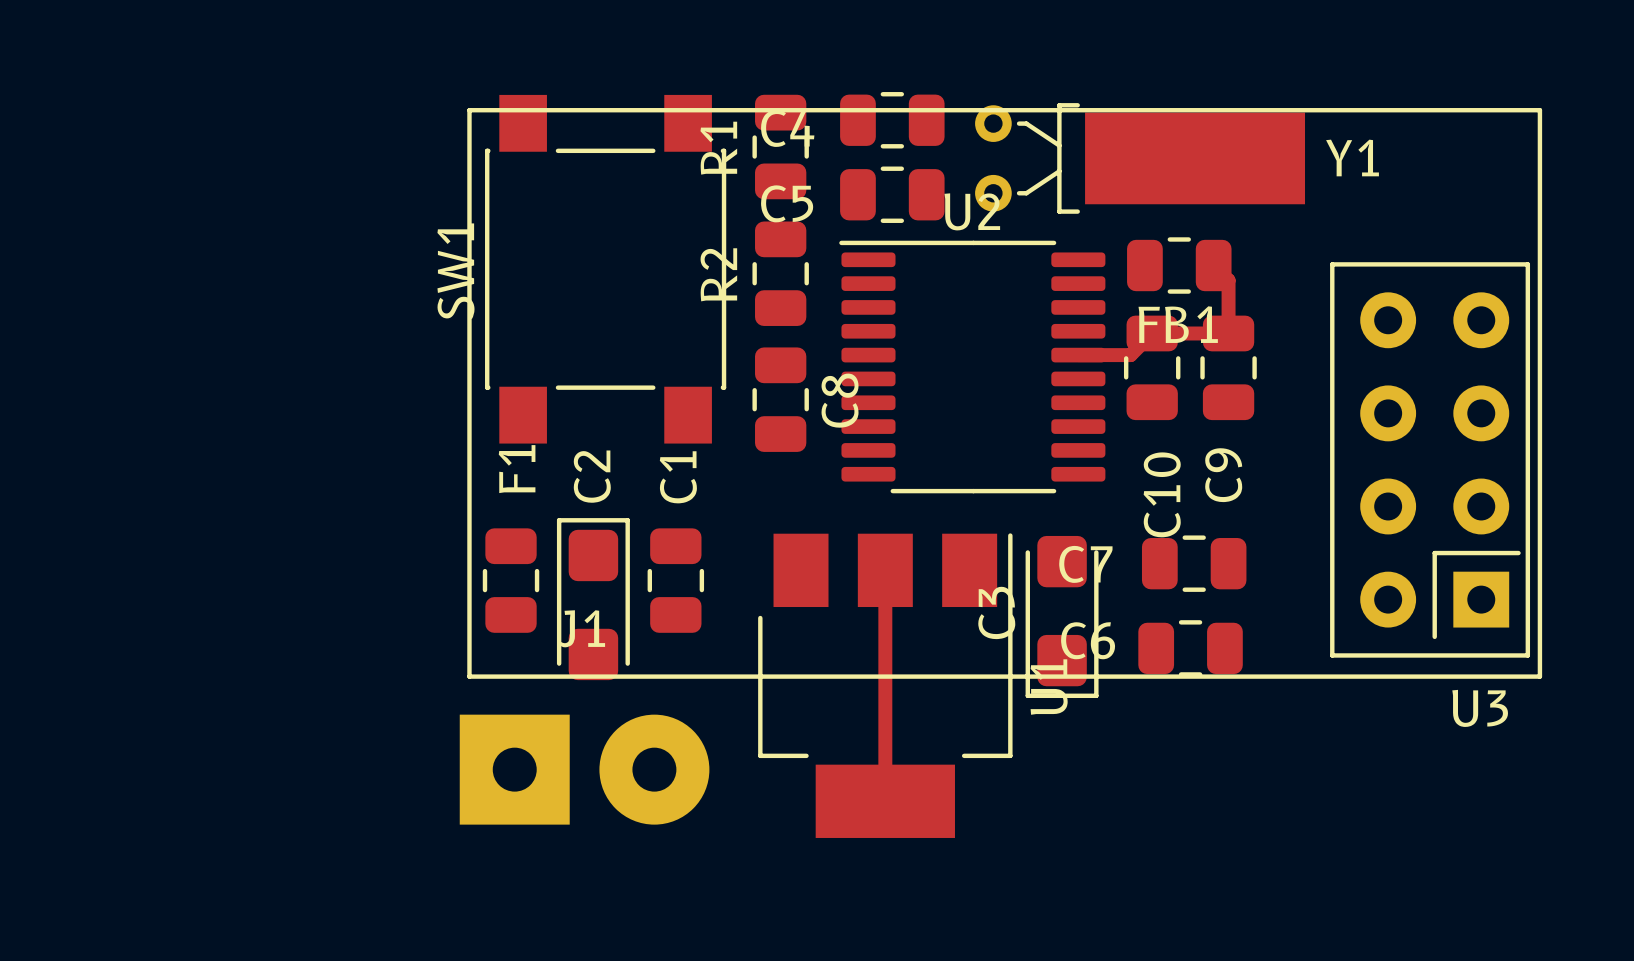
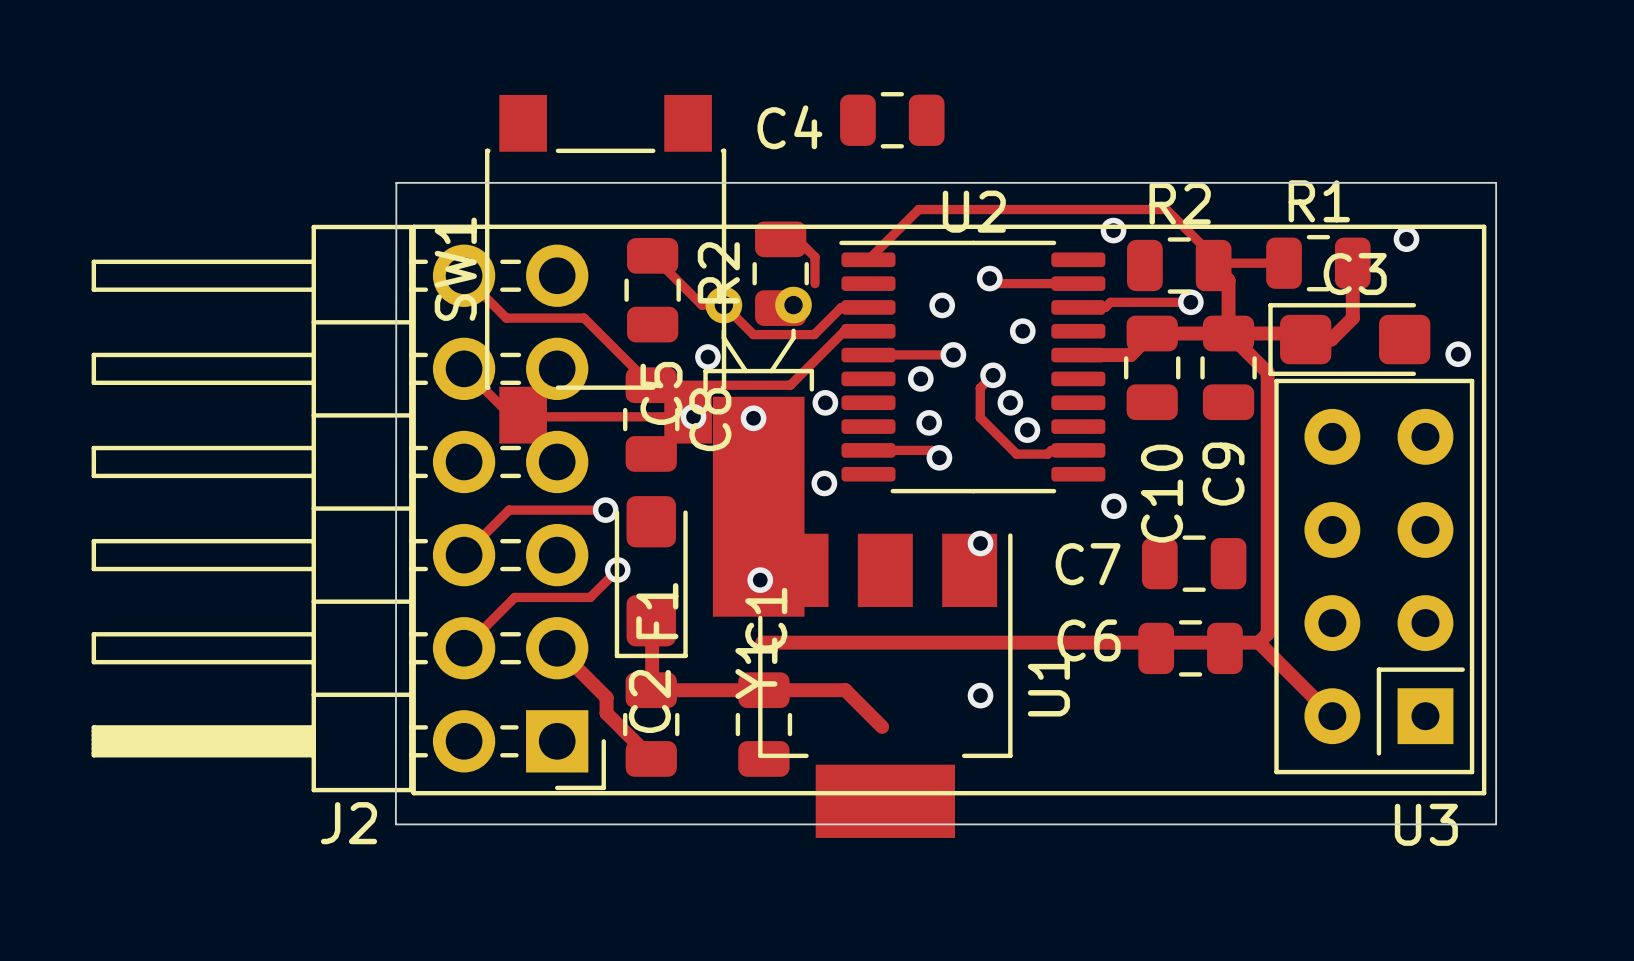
R1 rotation: 0° (780, 147) -> 90° clockwise (1318, 263)
R1 position: (780, 147) -> (1318, 263)
Y1 rotation: 0° (1140, 158) -> 90° clockwise (758, 451)
Y1 position: (1140, 158) -> (758, 451)
C5 rotation: 0° (892, 194) -> 90° clockwise (652, 290)
C5 position: (892, 194) -> (652, 290)
C5 name position: C5 (787, 203) -> C5 (661, 393)
via: none -> (1113, 230)
track: none -> (794, 236) (815, 257) (815, 283)
via: none -> (1406, 239)
track: none -> (652, 255) (701, 305) (723, 305) (753, 334) (814, 334) (841, 307) (868, 307)
track: none -> (868, 259) (918, 209) (1166, 209) (1220, 263) (1284, 263)
track: none -> (1352, 263) (1352, 318) (1331, 339) (1305, 339) (1299, 333) (1228, 333) (1267, 372) (1267, 633) (1258, 642)
track: none -> (464, 275) (506, 318) (584, 318) (651, 385) (790, 385) (844, 331) (868, 331)
track: none -> (989, 278) (994, 283) (1078, 283)
via: none -> (989, 278)
track: none -> (1190, 302) (1110, 302) (1105, 307) (1078, 307)
via: none -> (1190, 302)
via: none -> (942, 305)
FB1 name: FB1 (1178, 324) -> R2 (1180, 203)
via: none -> (1022, 331)
track: none -> (868, 354) (953, 354)
via: none -> (953, 354)
via: none -> (1458, 354)
via: none -> (707, 356)
track: none -> (464, 368) (512, 416) (693, 416)
track: none -> (993, 375) (980, 388) (980, 417) (1016, 454) (1047, 454) (1051, 450) (1078, 450)
via: none -> (993, 375)
via: none -> (920, 378)
U3 position: (1004, 393) -> (948, 509)
C8 position: (780, 399) -> (651, 419)
via: none -> (825, 402)
via: none -> (1010, 402)
via: none -> (693, 416)
via: none -> (753, 418)
via: none -> (929, 422)
via: none -> (1027, 430)
track: none -> (868, 450) (932, 450) (939, 457)
via: none -> (939, 457)
via: none -> (824, 483)
via: none -> (1114, 506)
J2: none -> (348, 508)
track: none -> (605, 510) (509, 510) (464, 555)
via: none -> (605, 510)
via: none -> (980, 543)
track: none -> (617, 570) (590, 597) (514, 597) (464, 648)
via: none -> (617, 570)
track: (885, 570) (885, 801) -> none
F1 position: (511, 580) -> (651, 724)
C1 position: (675, 580) -> (763, 724)
via: none -> (760, 580)
C2 rotation: 0° (593, 599) -> 180° (651, 577)
C3 rotation: 0° (1062, 616) -> 90° clockwise (1349, 339)
C3 position: (1062, 616) -> (1349, 339)
track: none -> (652, 617) (652, 690) (845, 690) (882, 726)
track: none -> (762, 642) (1258, 642)
track: none -> (1258, 642) (1332, 716)
track: none -> (557, 648) (606, 697) (606, 713) (652, 758)
via: none -> (980, 695)
J1: (584, 769) -> none
board edge: none -> (395, 824) (396, 182) (1496, 182) (1496, 824) (396, 824)

